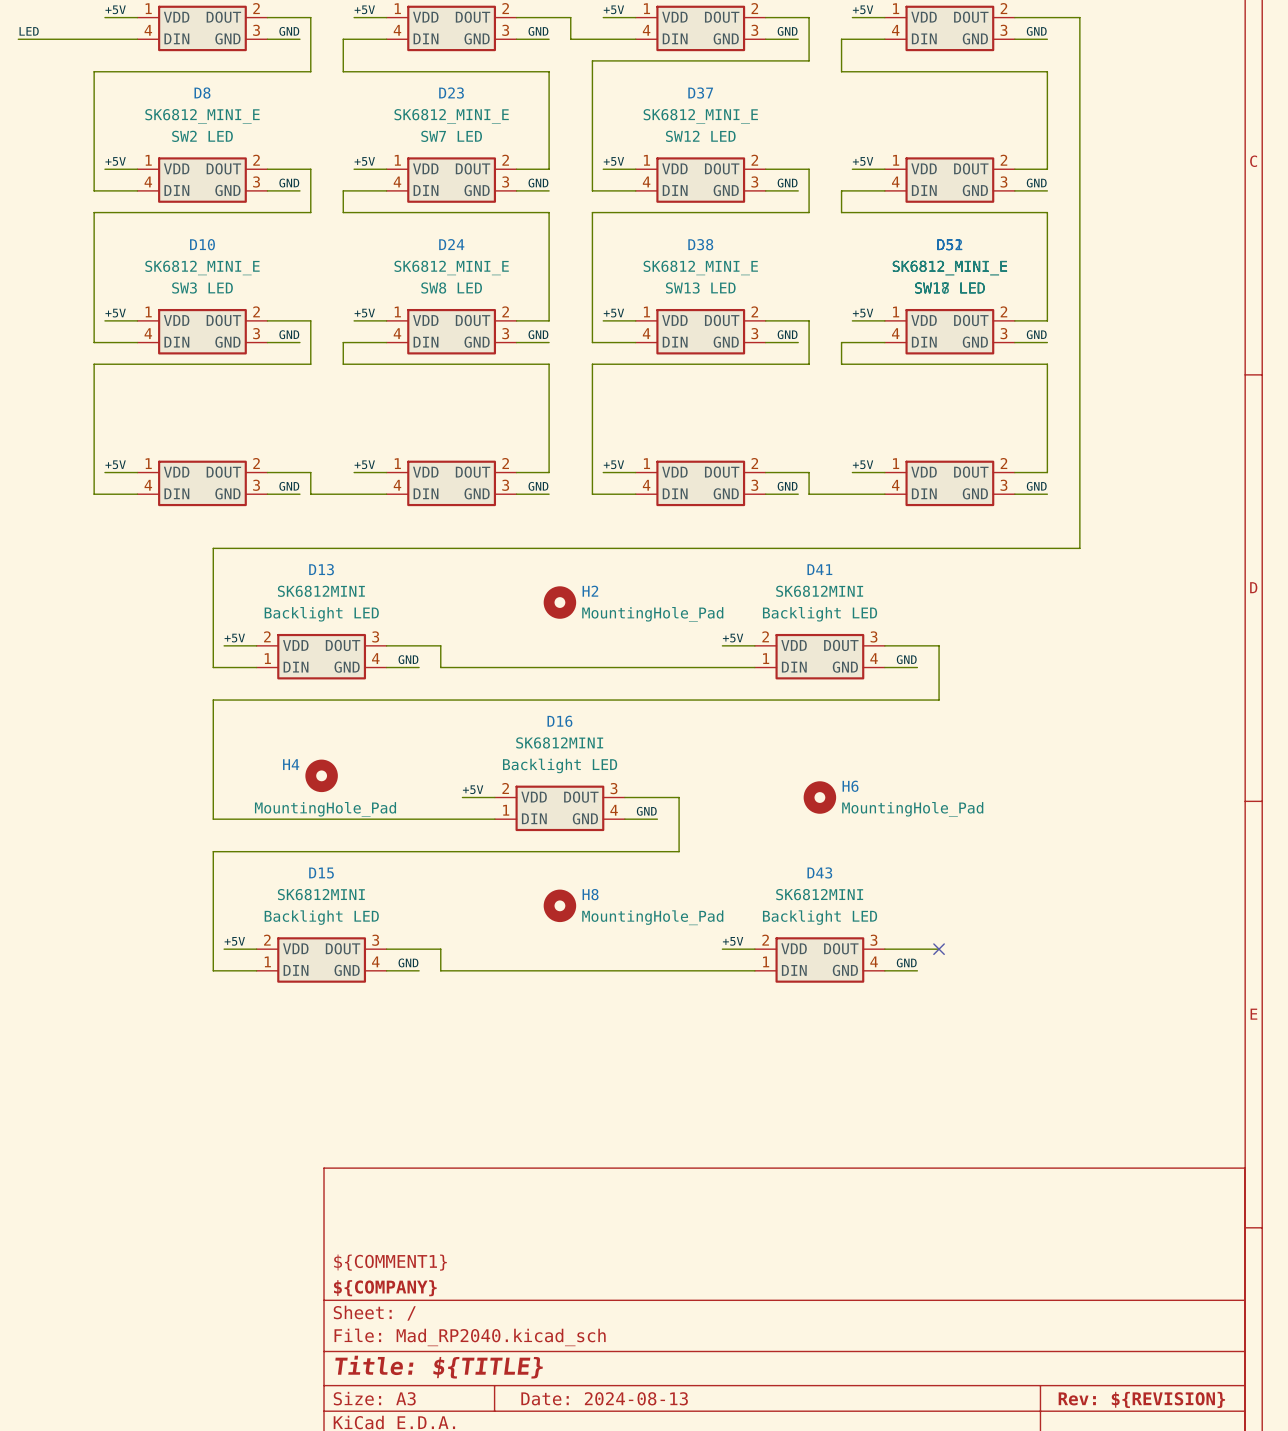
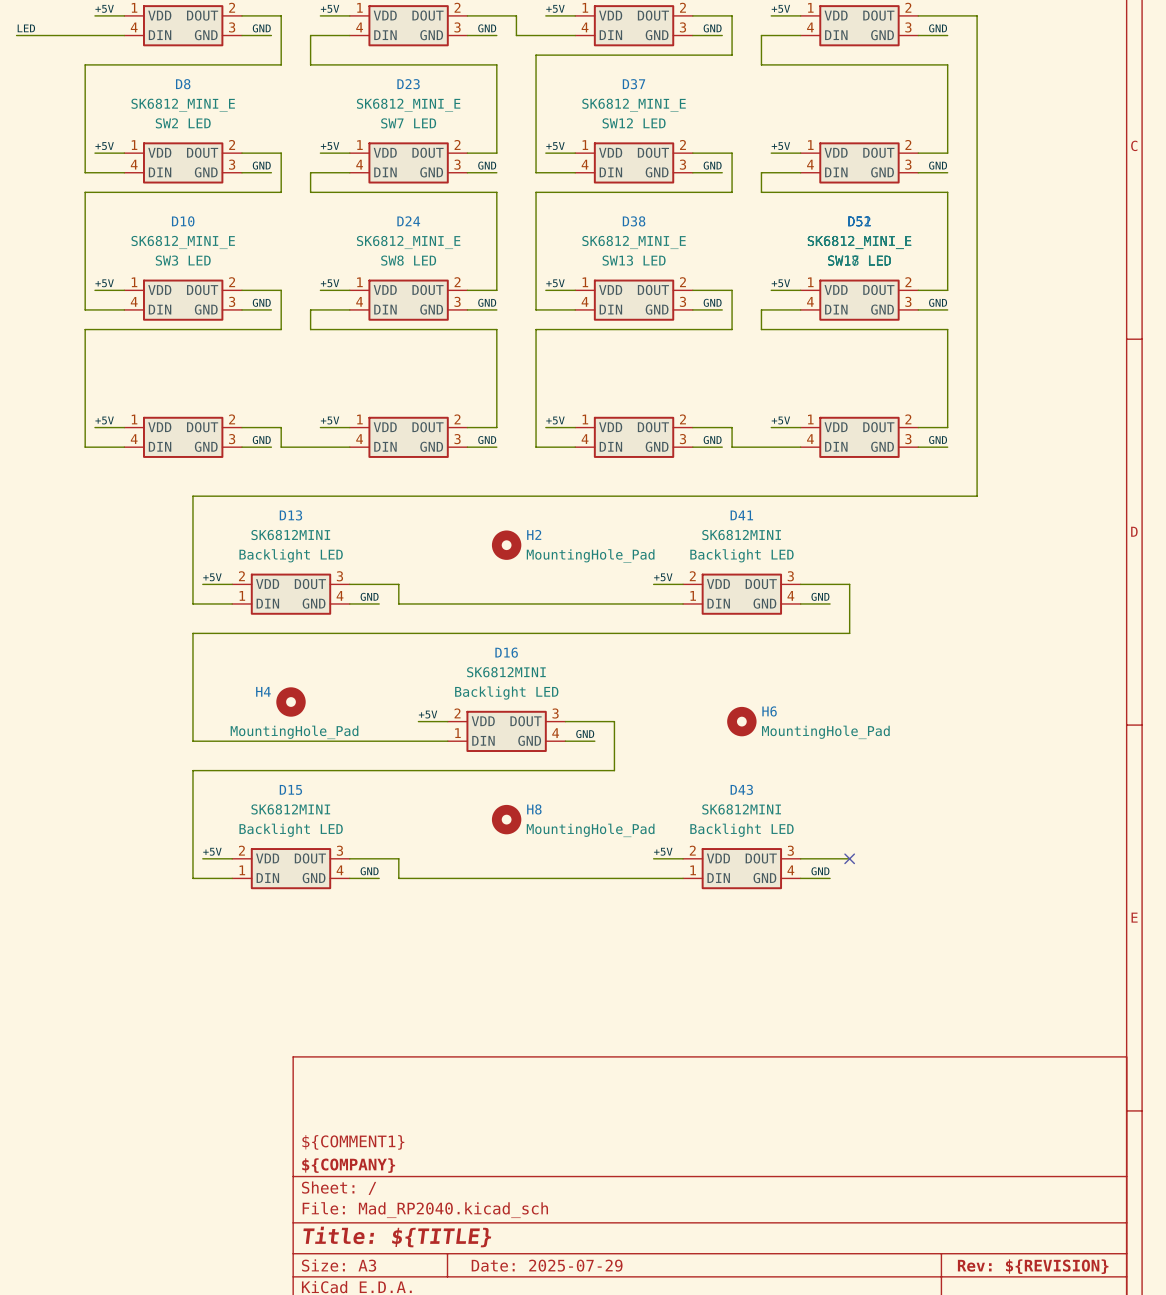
title block: Date: 2024-08-13 (604, 1398) -> Date: 2025-07-29 (547, 1265)

